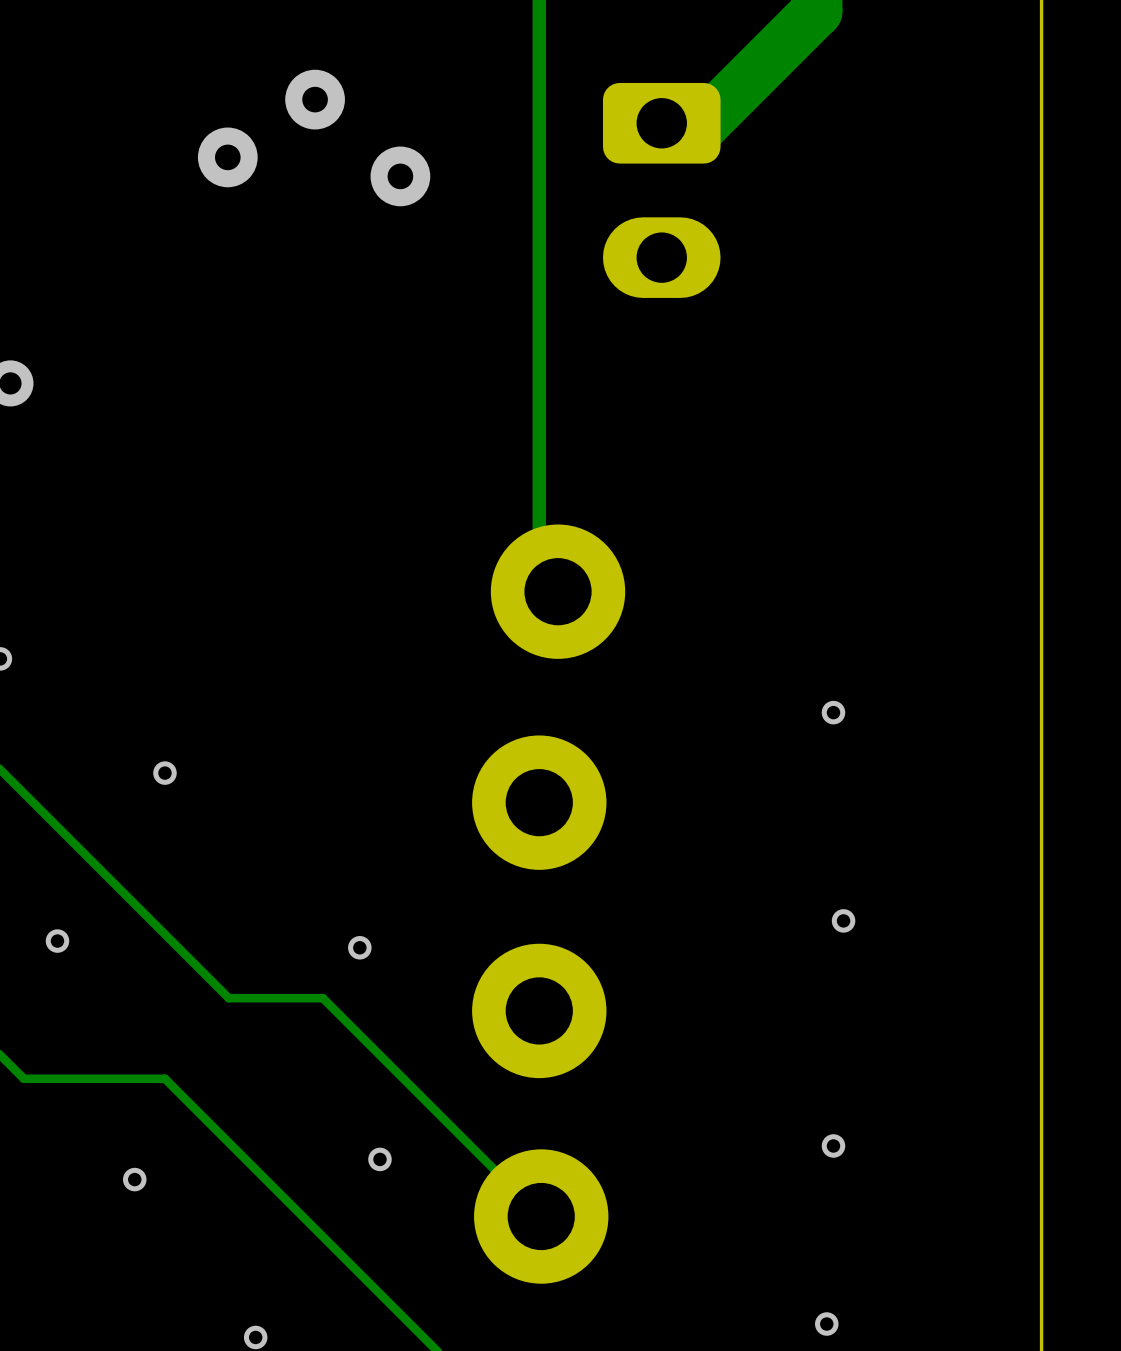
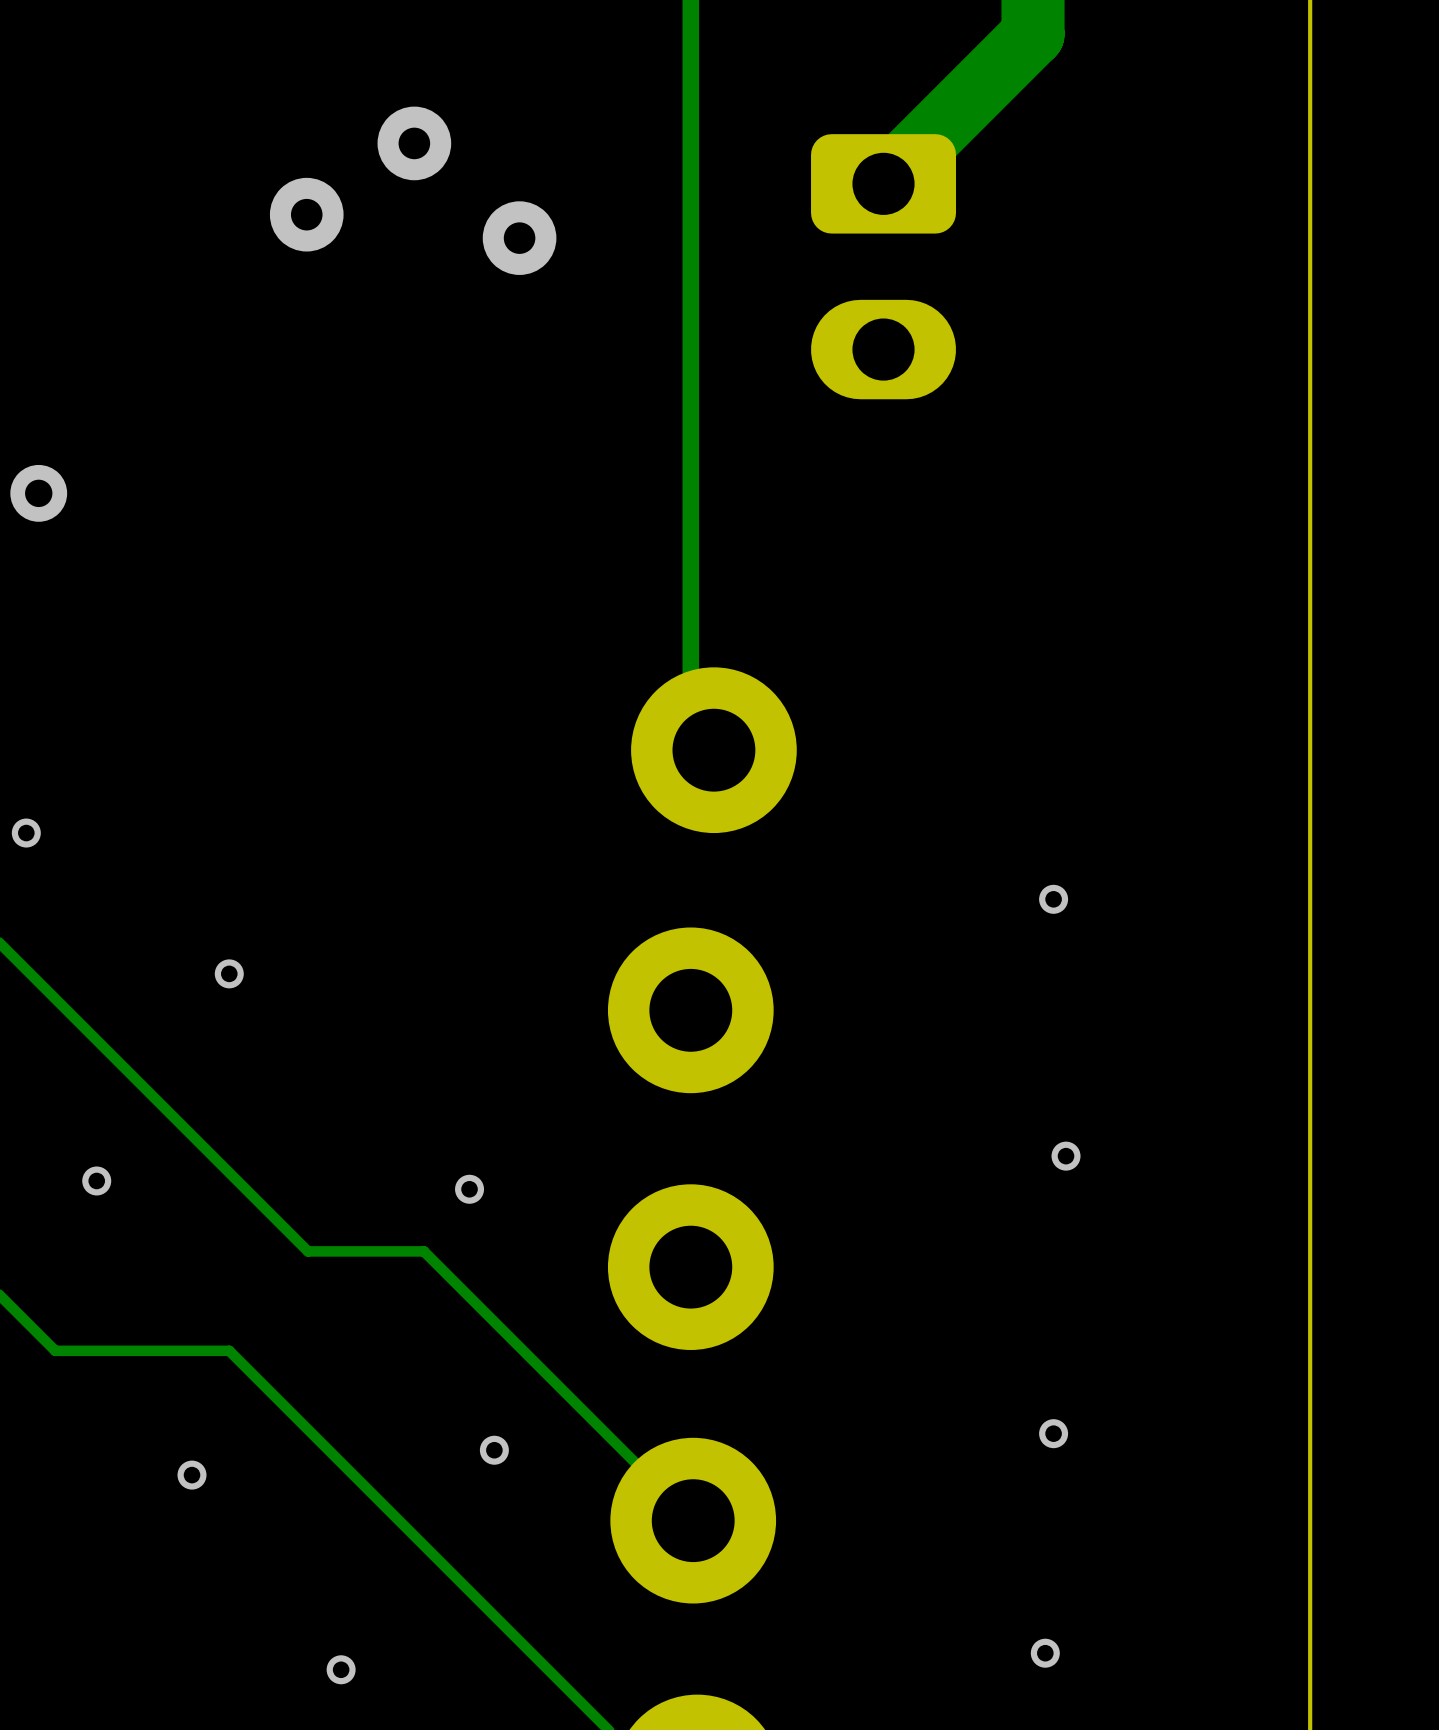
part position: (661, 190) -> (883, 266)

